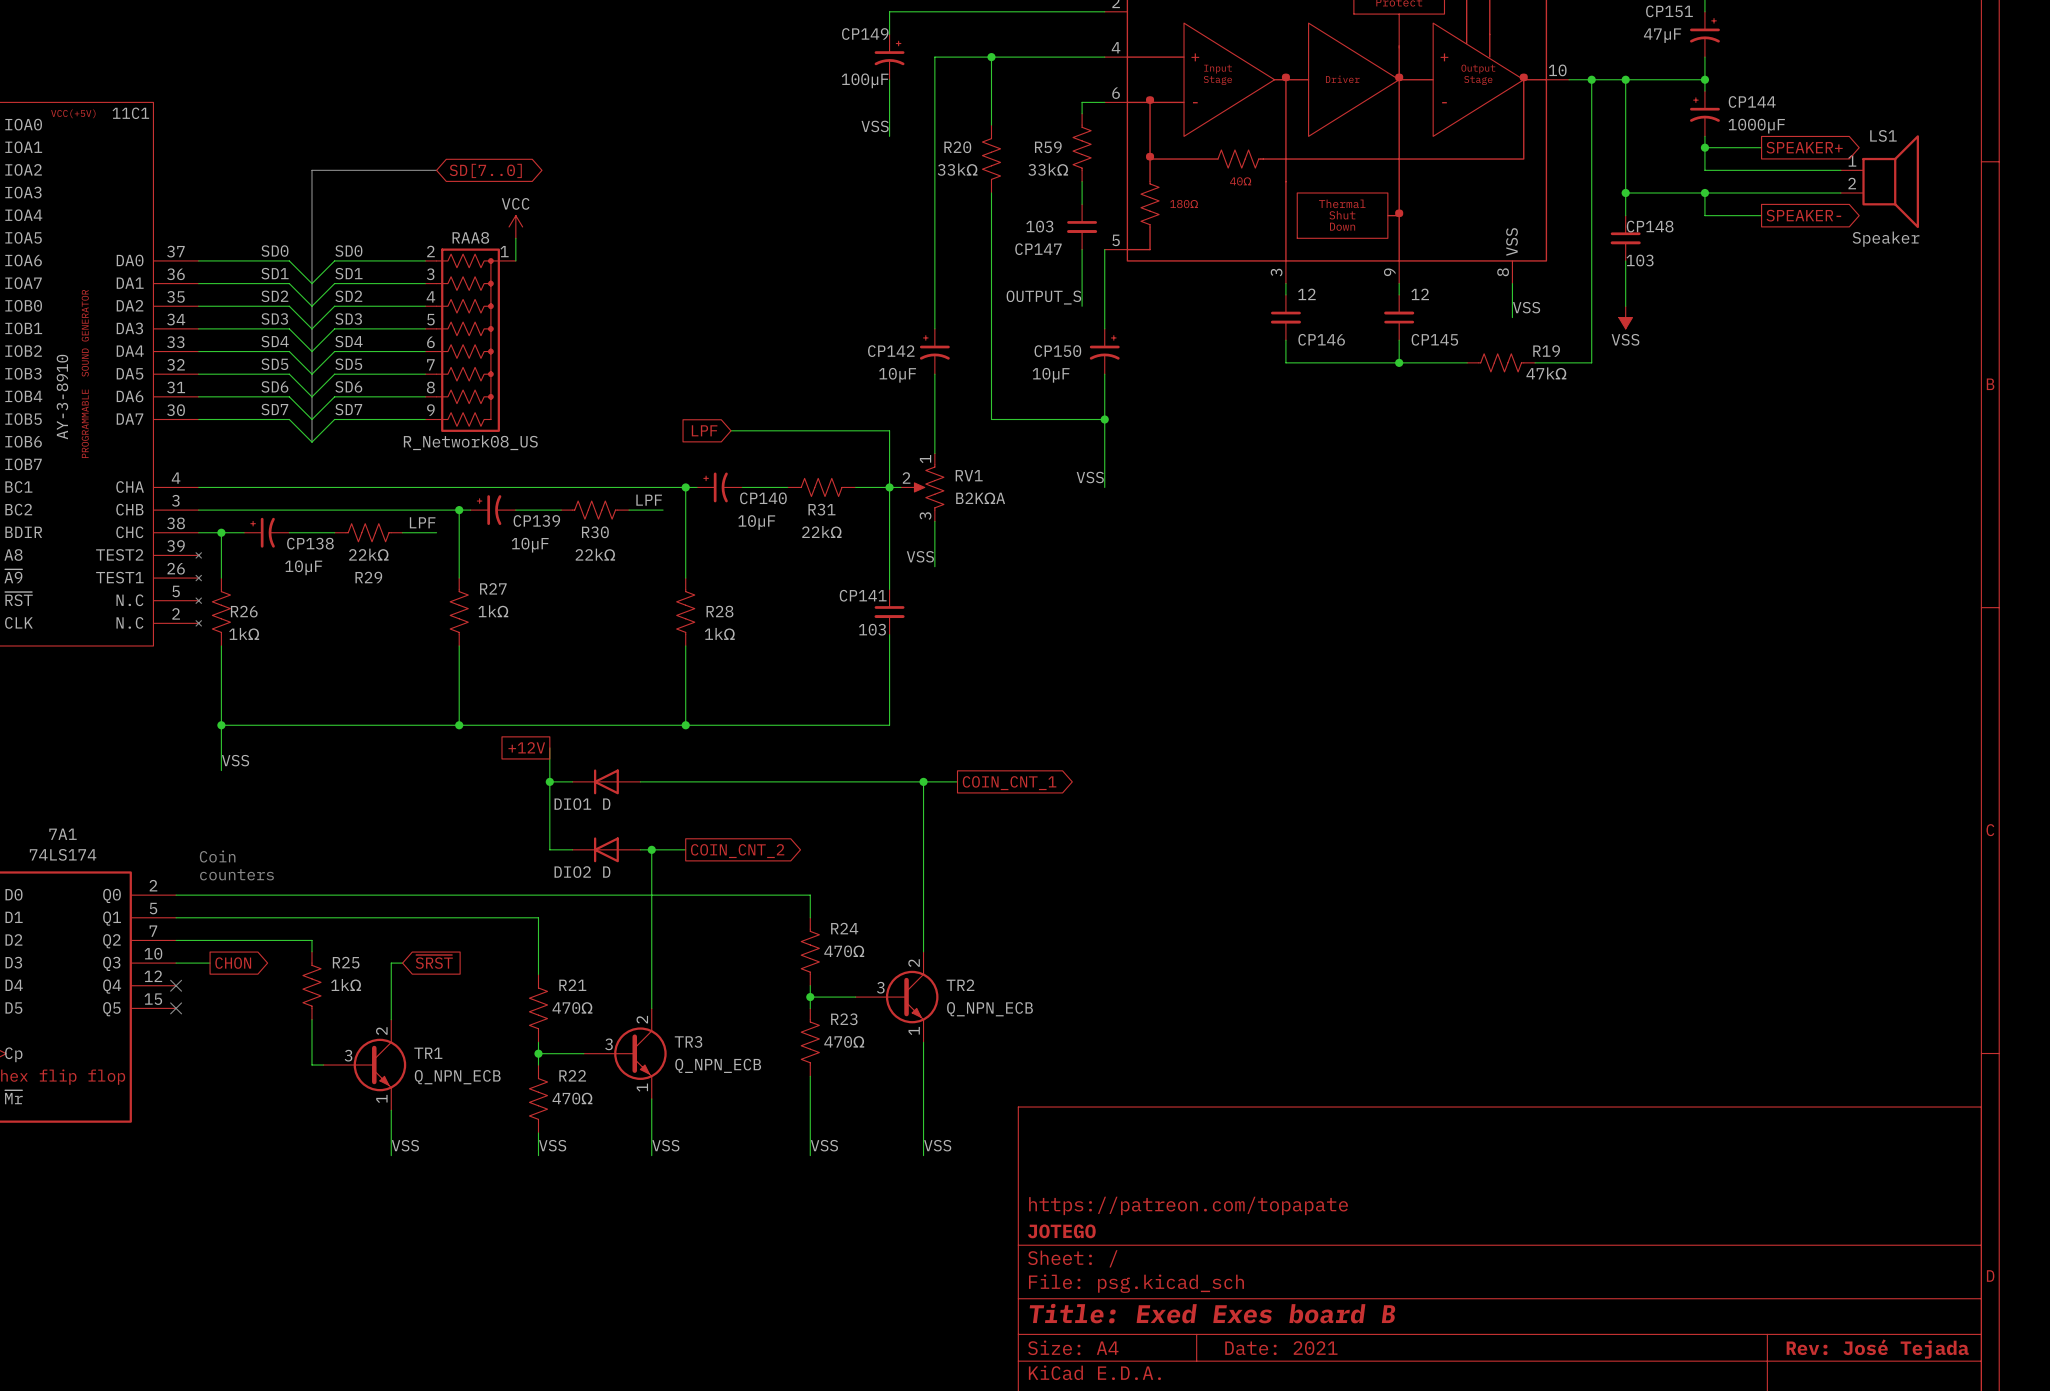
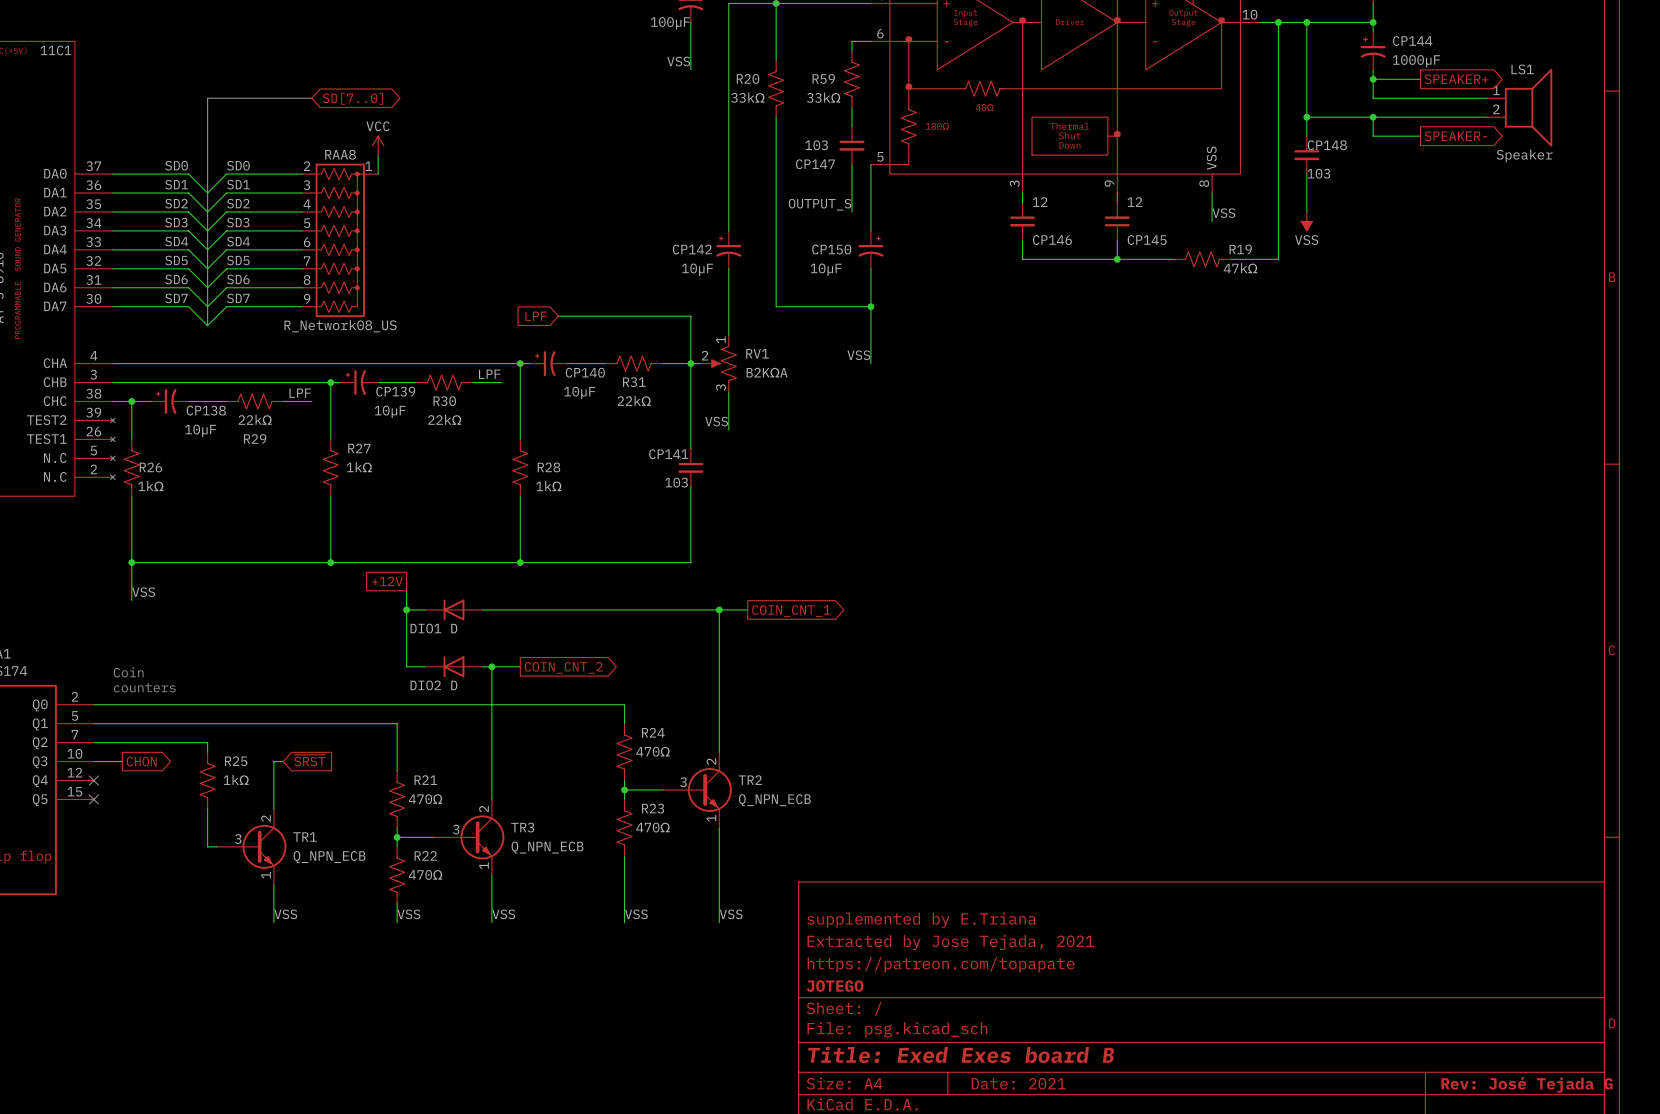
title block: none -> supplemented by E.Triana (921, 920)
title block: none -> Extracted by Jose Tejada, 2021 (950, 942)
title block: Rev: José Tejada (1877, 1349) -> Rev: José Tejada G (1527, 1084)

